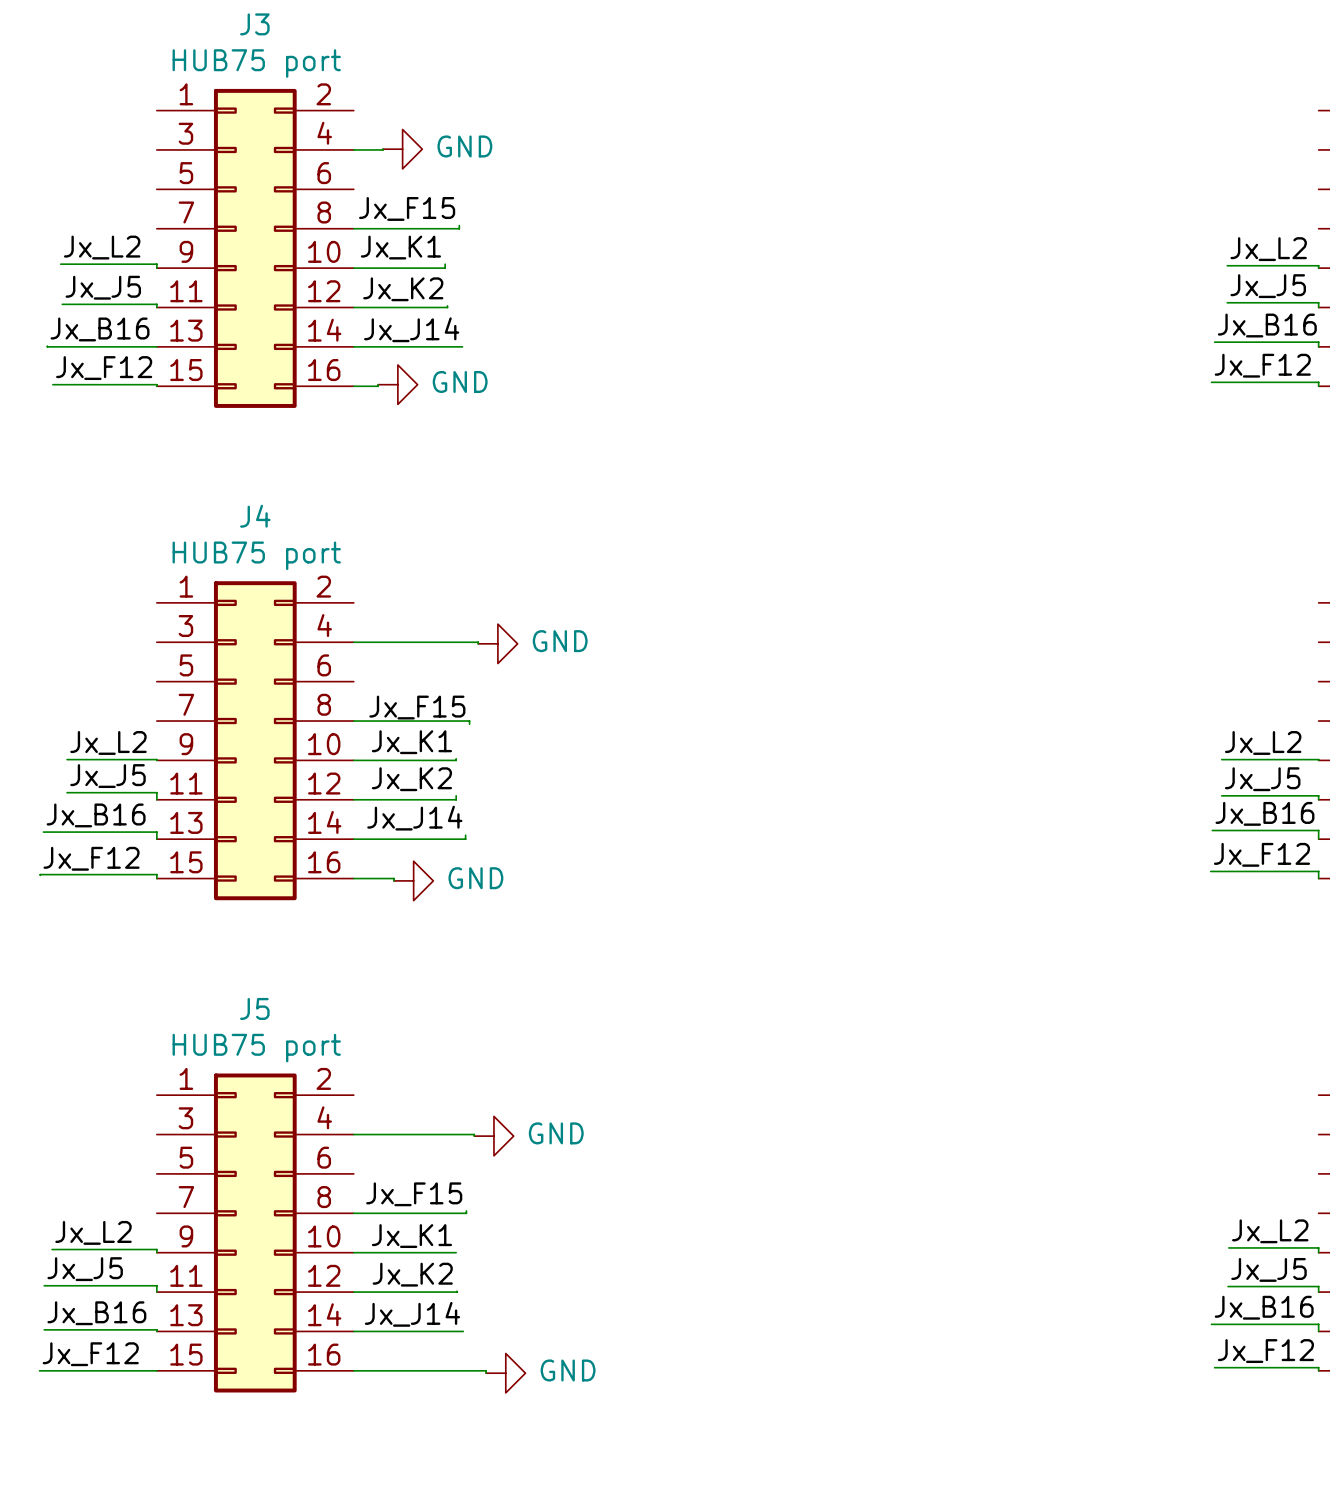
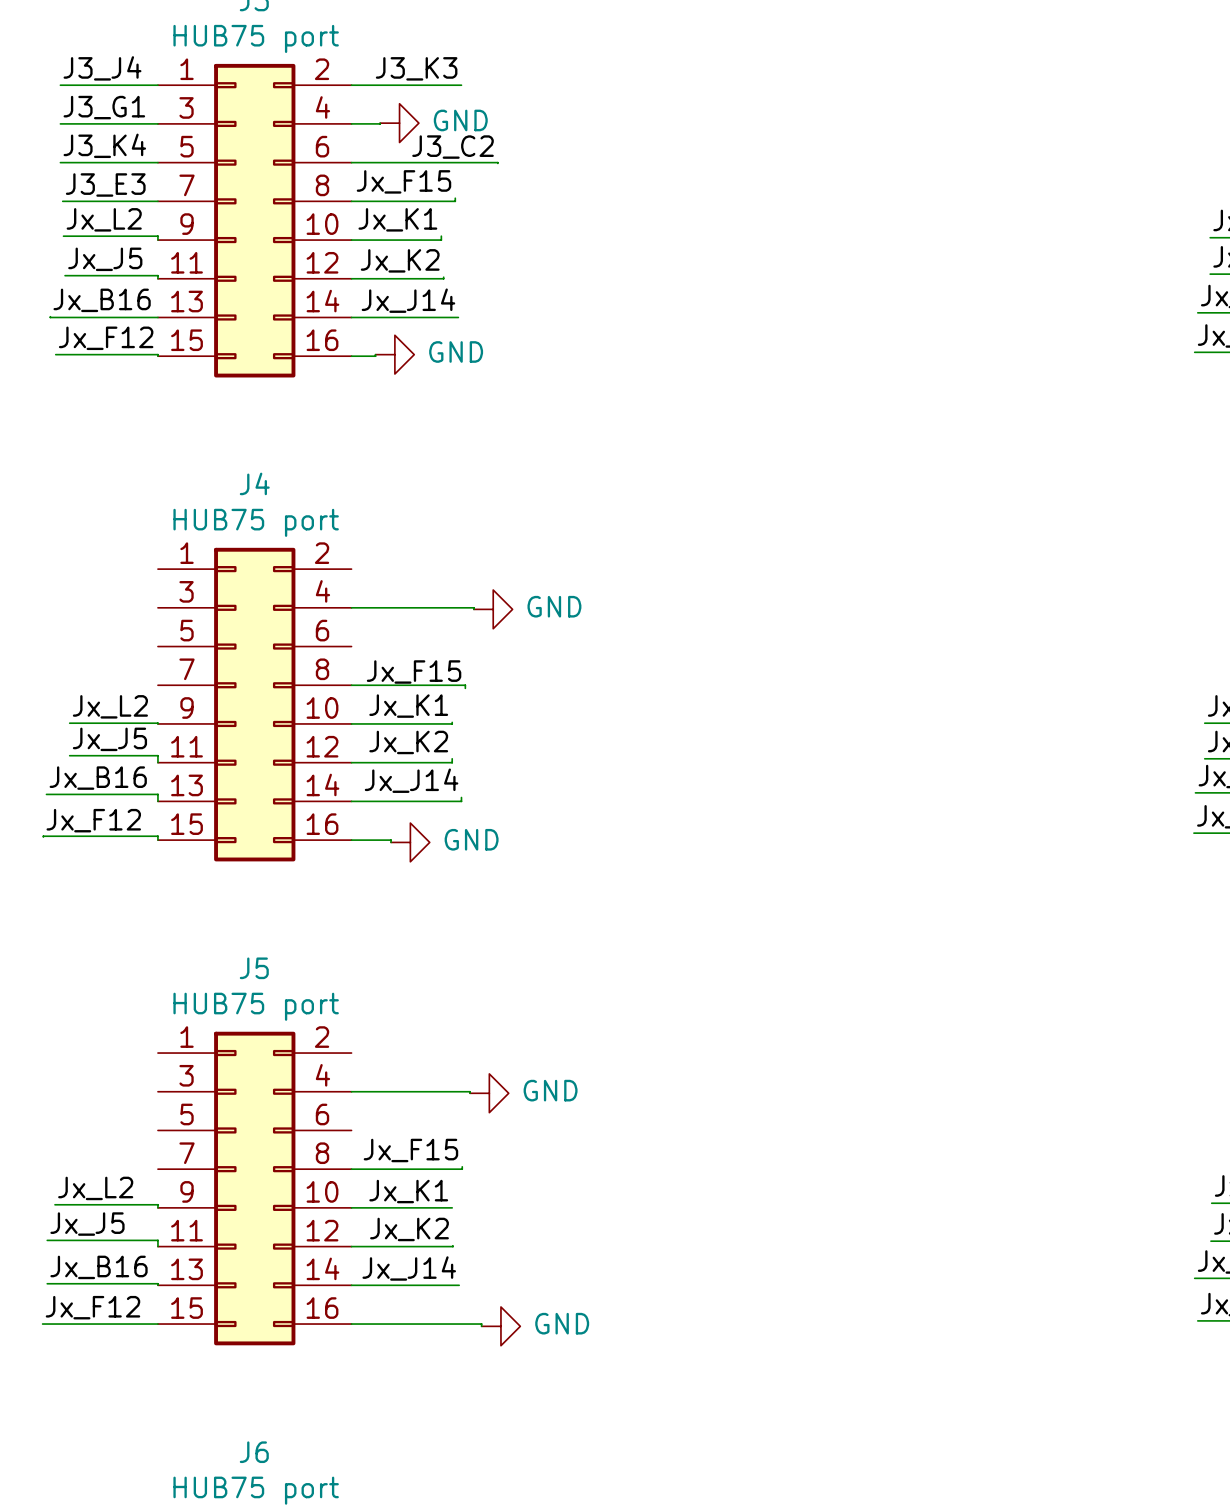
label: none -> J3_J4 (102, 68)
label: none -> J3_K3 (416, 68)
wire: none -> (60, 85) (157, 85)
wire: none -> (351, 85) (461, 85)
label: none -> J3_G1 (104, 107)
wire: none -> (60, 123) (157, 123)
label: none -> J3_K4 (104, 145)
label: none -> J3_C2 (453, 147)
wire: none -> (60, 162) (157, 162)
wire: none -> (351, 162) (497, 163)
label: none -> J3_E3 (105, 184)
wire: none -> (62, 201) (157, 201)

